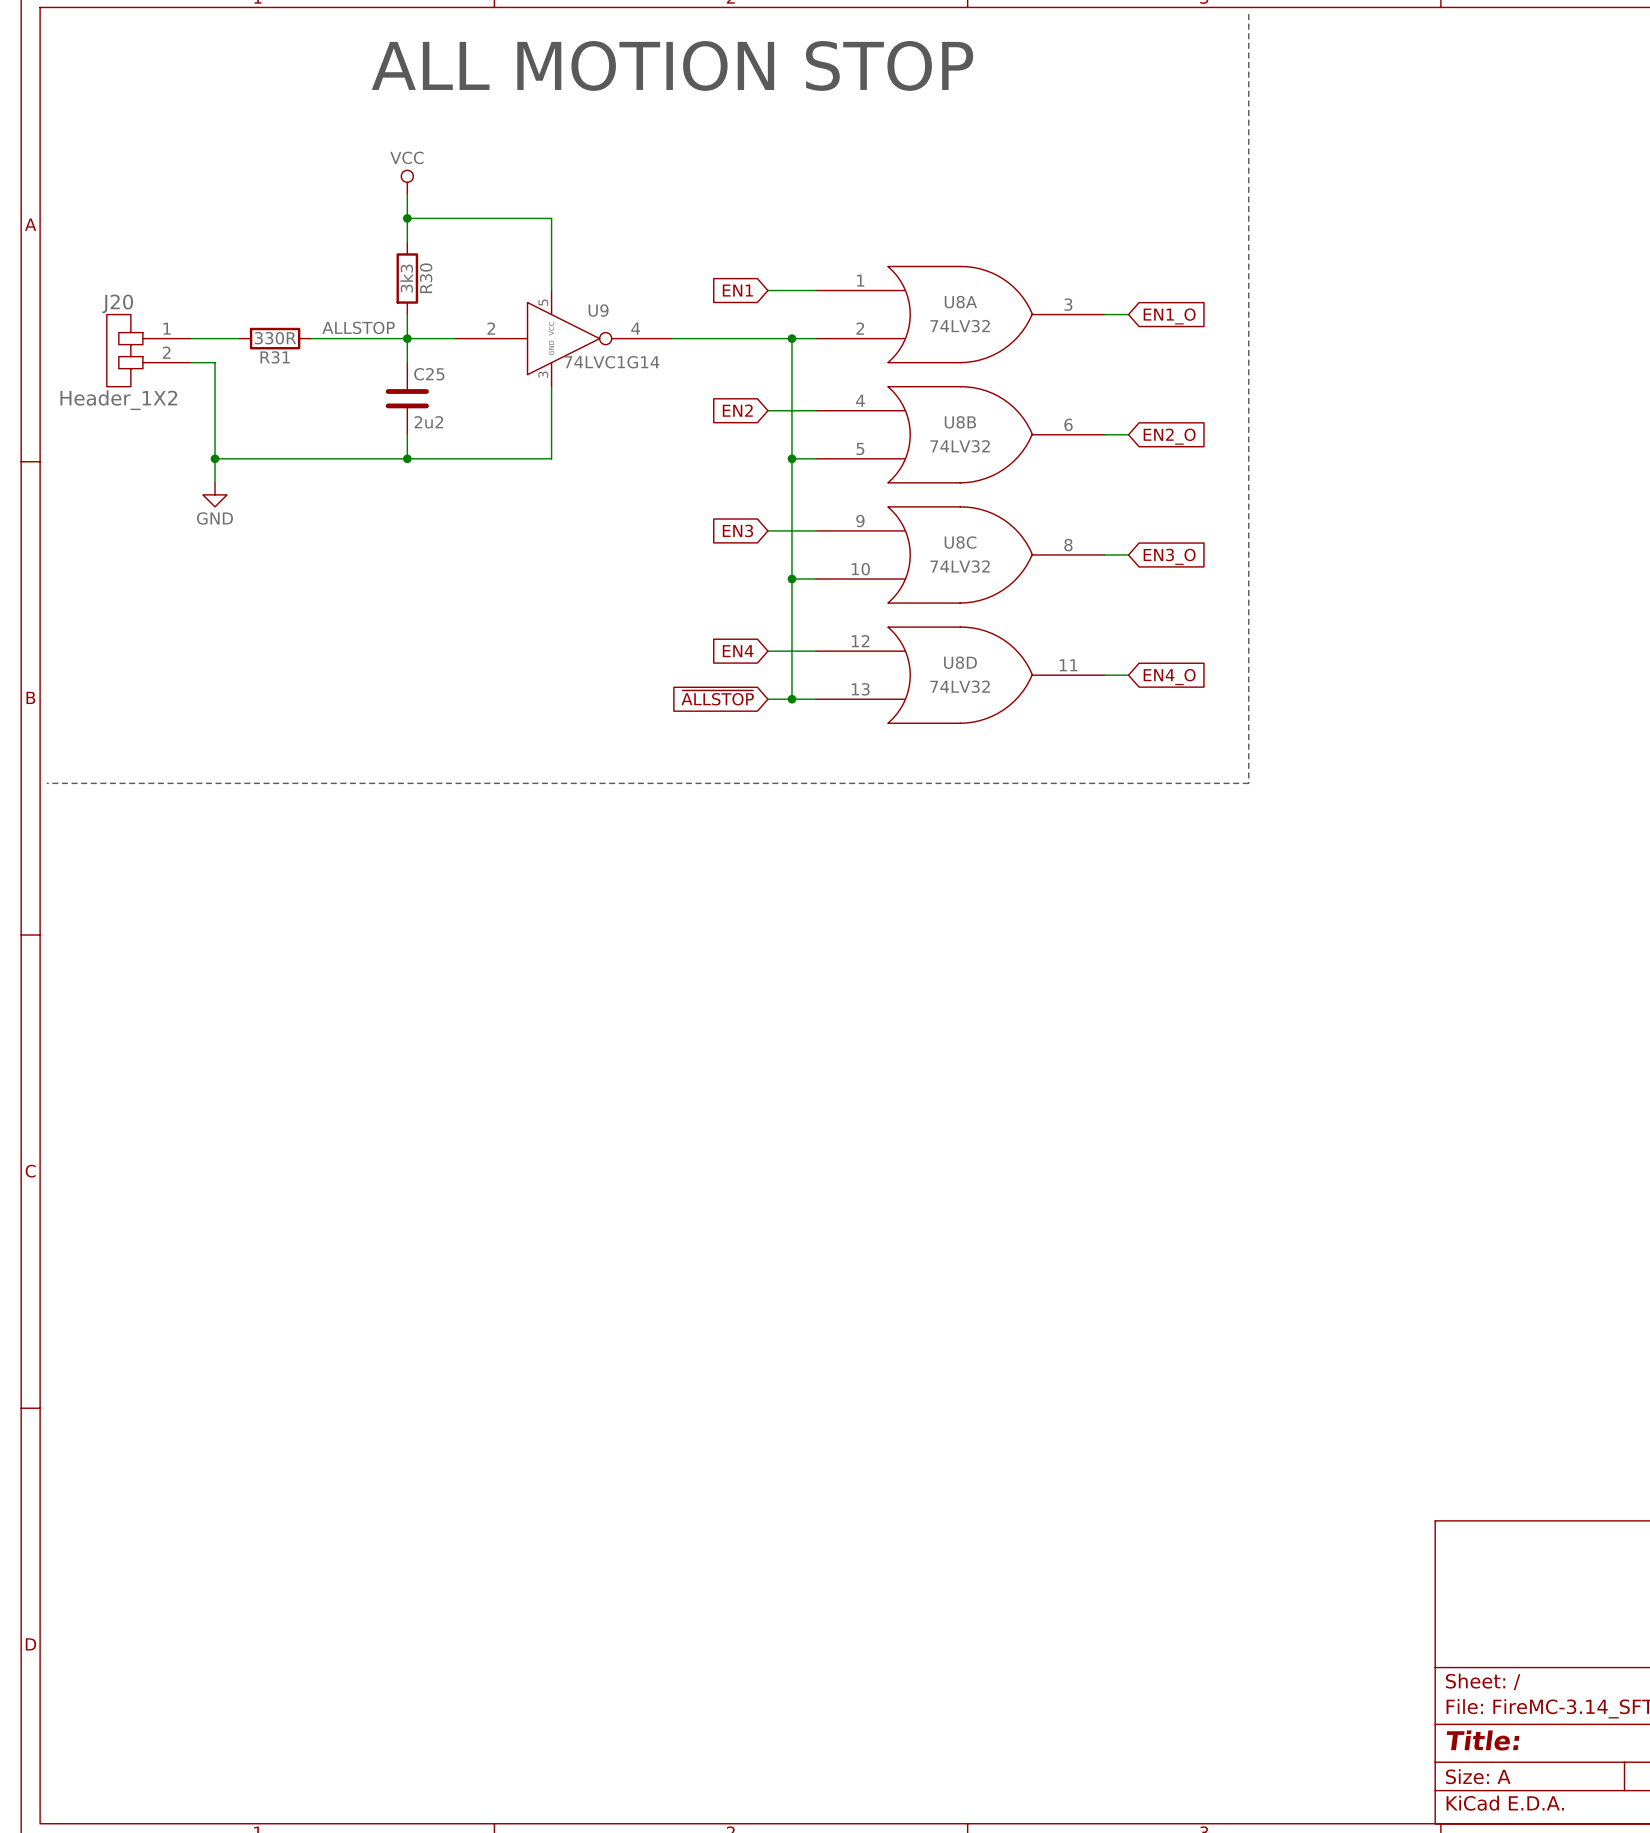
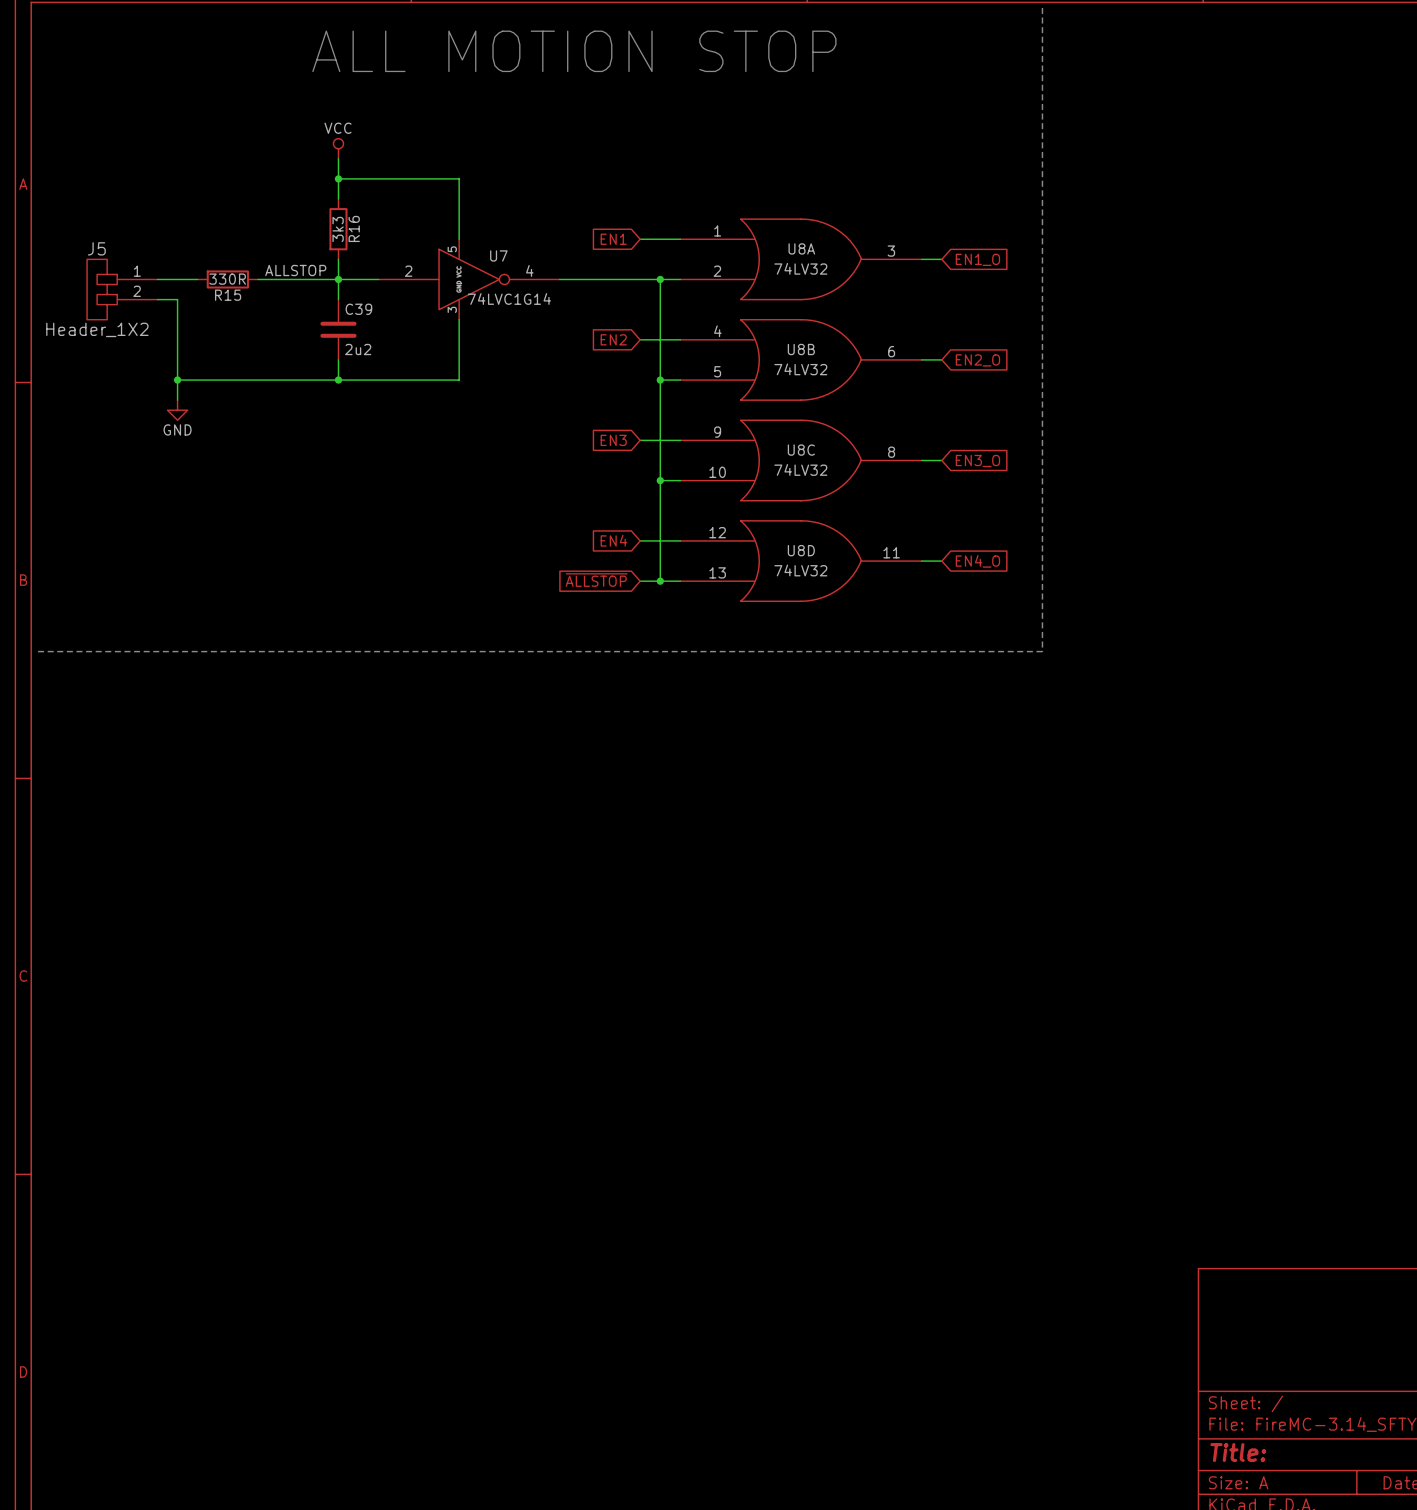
R30 name: R30 (426, 278) -> R16 (354, 228)
J20 name: J20 (117, 303) -> J5 (96, 248)
U9 name: U9 (598, 310) -> U7 (498, 255)
R31 name: R31 (275, 357) -> R15 (228, 295)
C25 name: C25 (429, 374) -> C39 (358, 309)

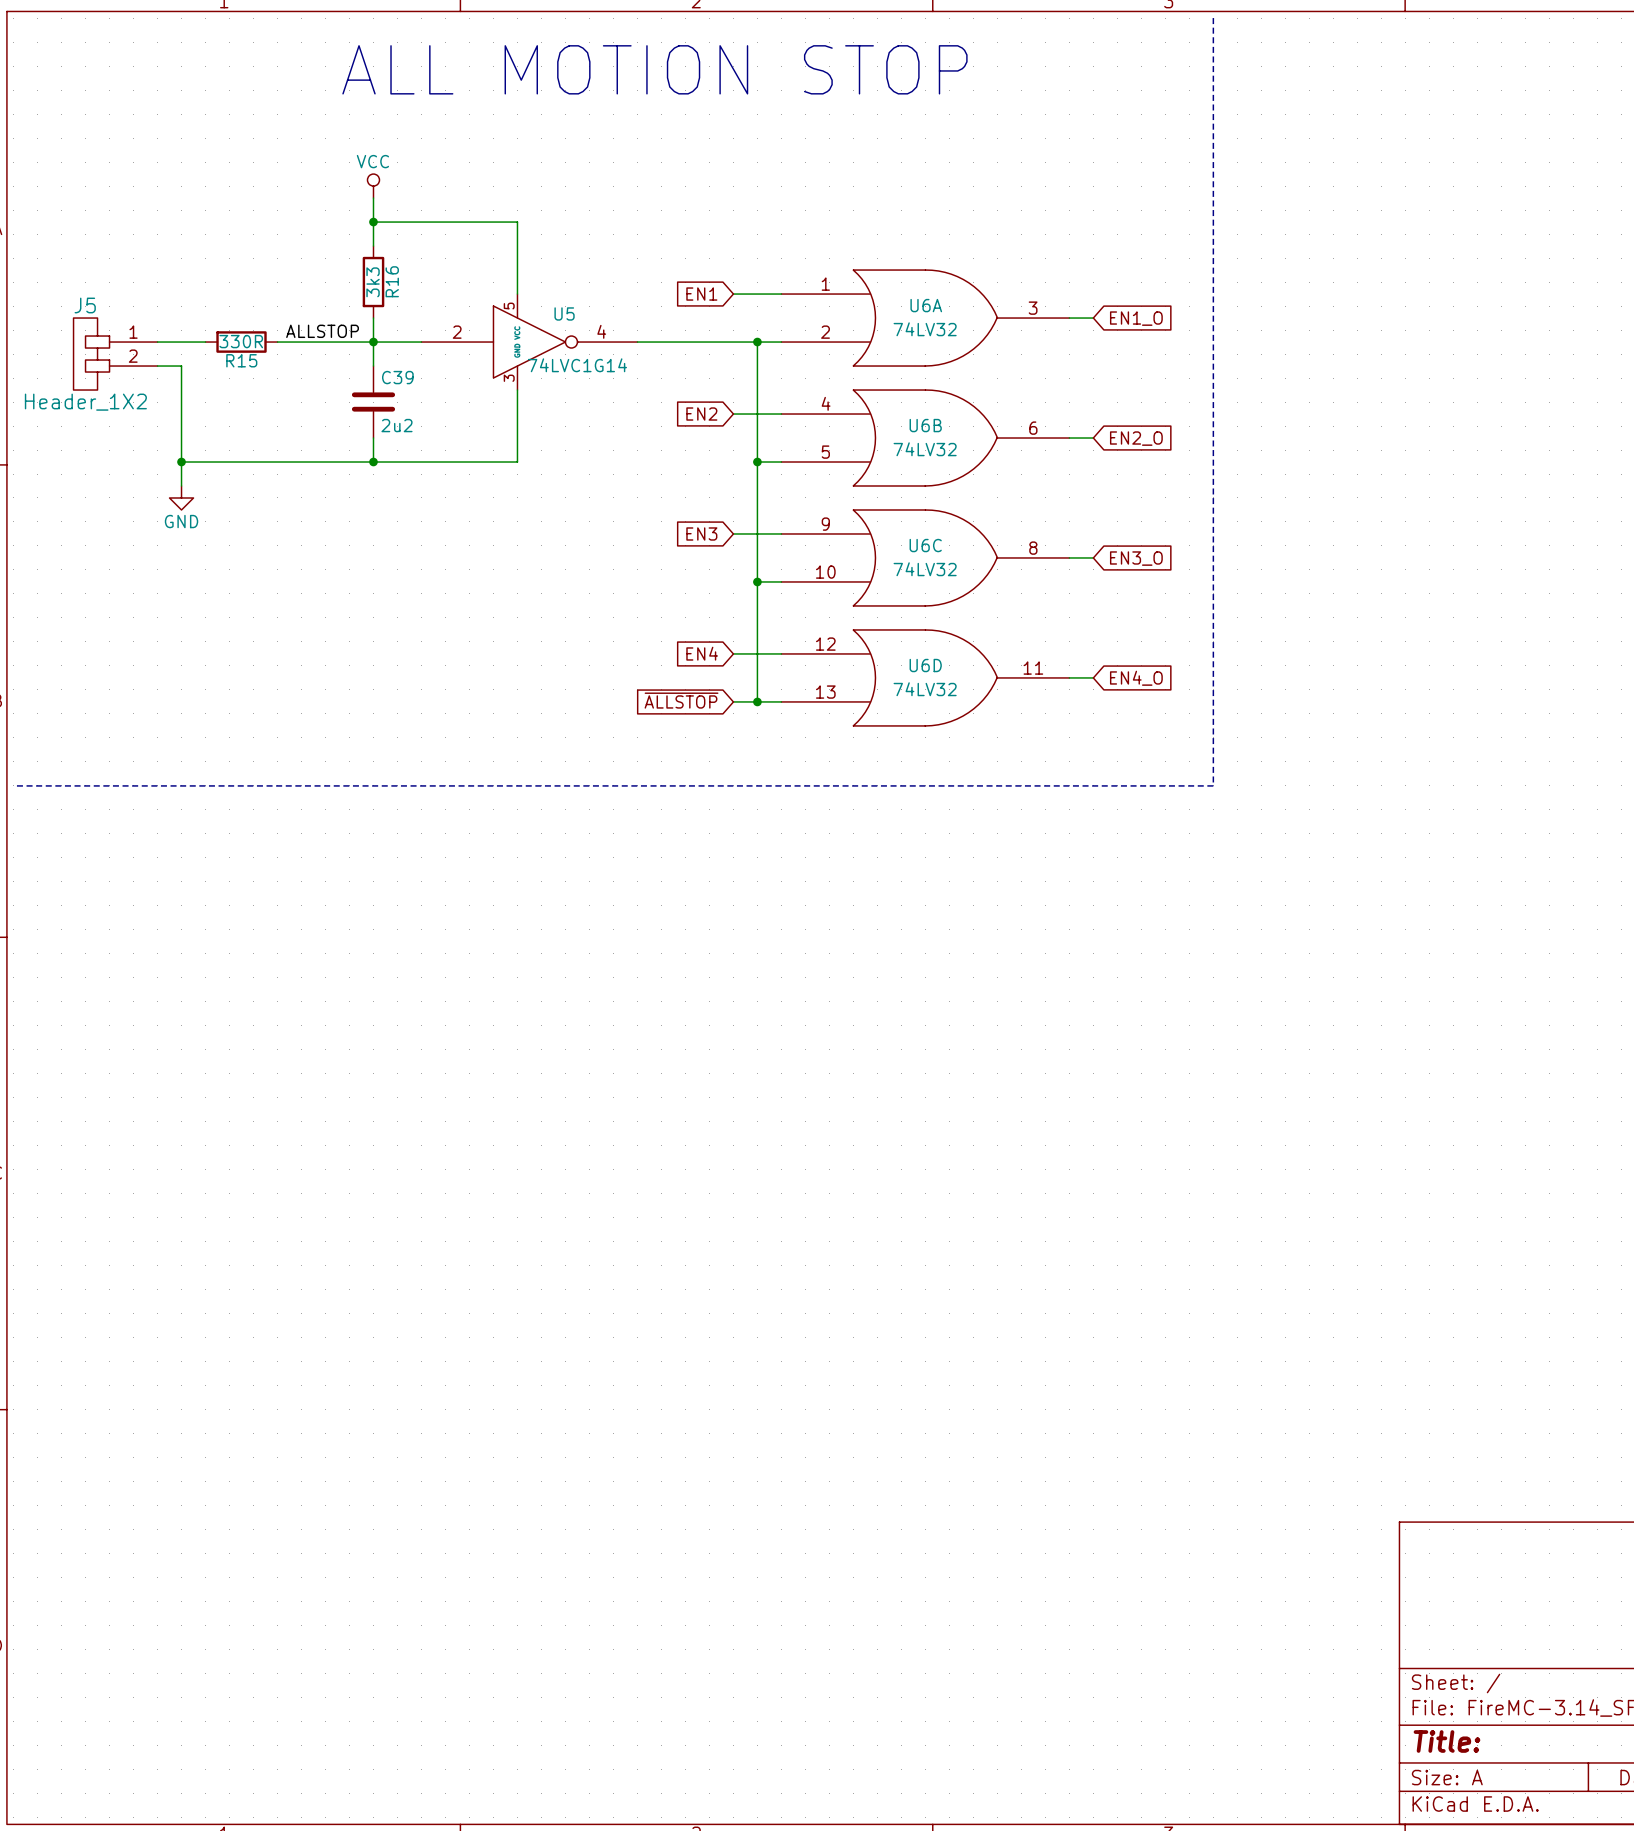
U8A name: U8A (801, 248) -> U6A (926, 305)
U7 name: U7 (498, 255) -> U5 (564, 313)
U8B name: U8B (801, 349) -> U6B (925, 425)
U8C name: U8C (801, 450) -> U6C (925, 545)
U8D name: U8D (801, 550) -> U6D (925, 665)

